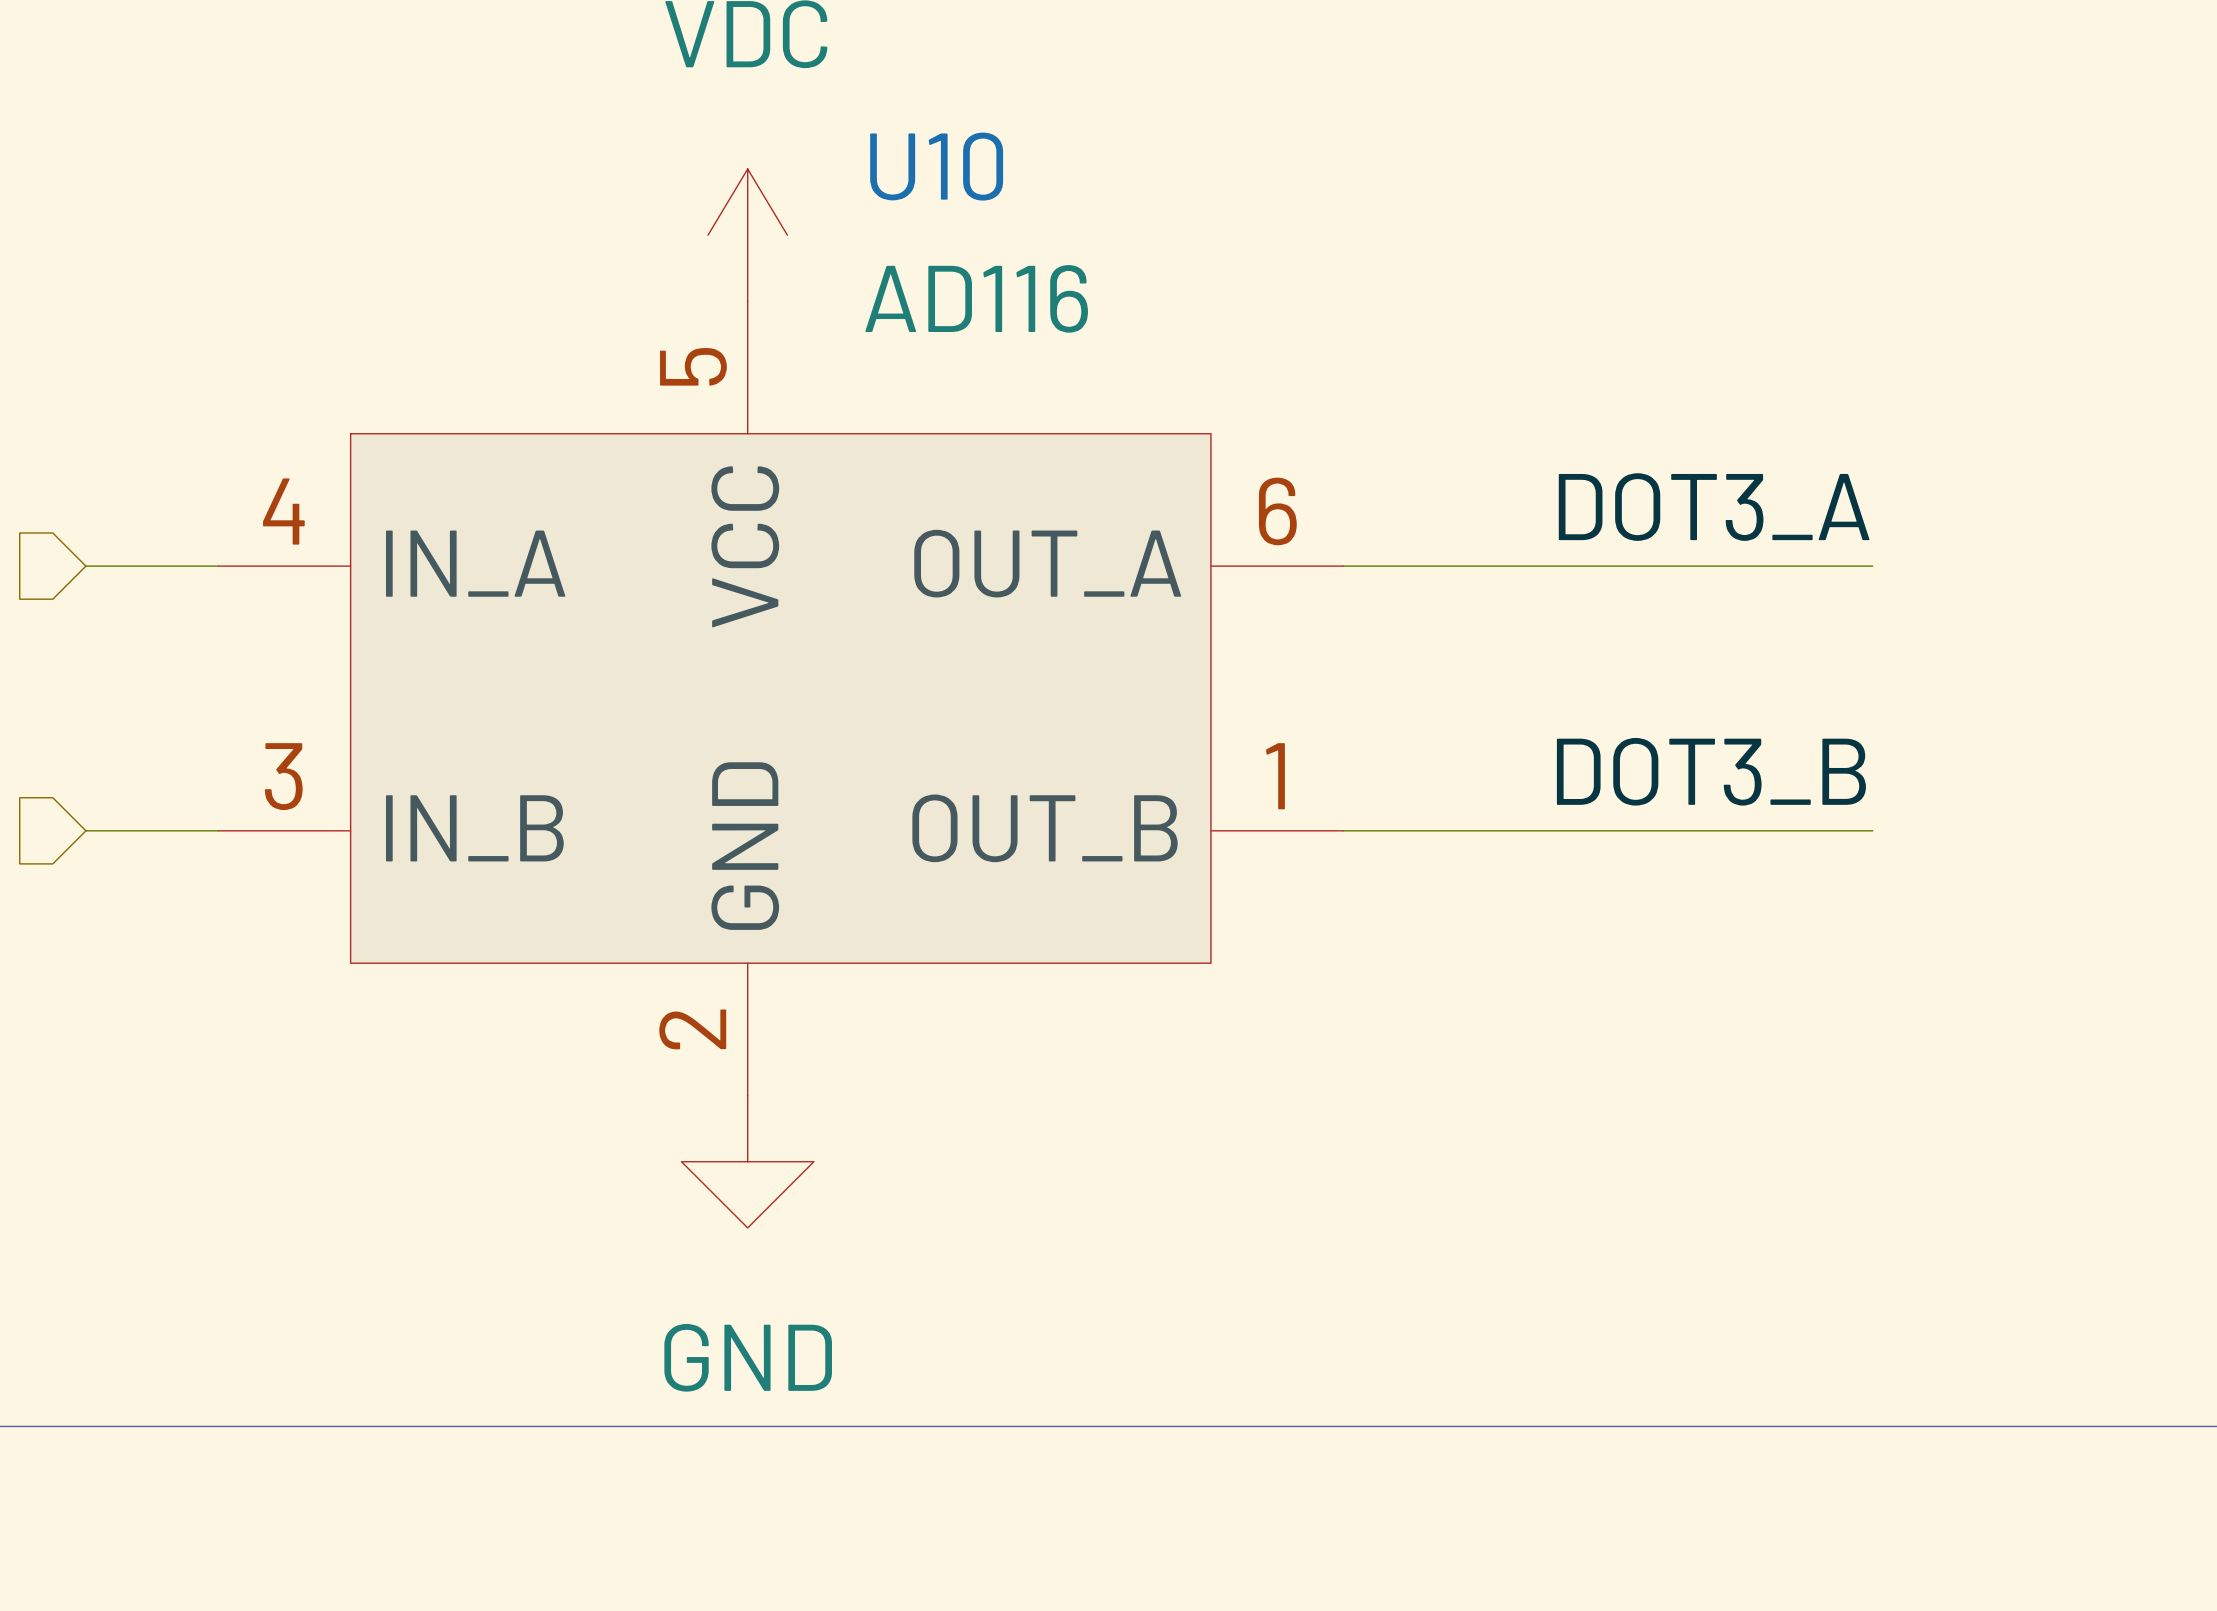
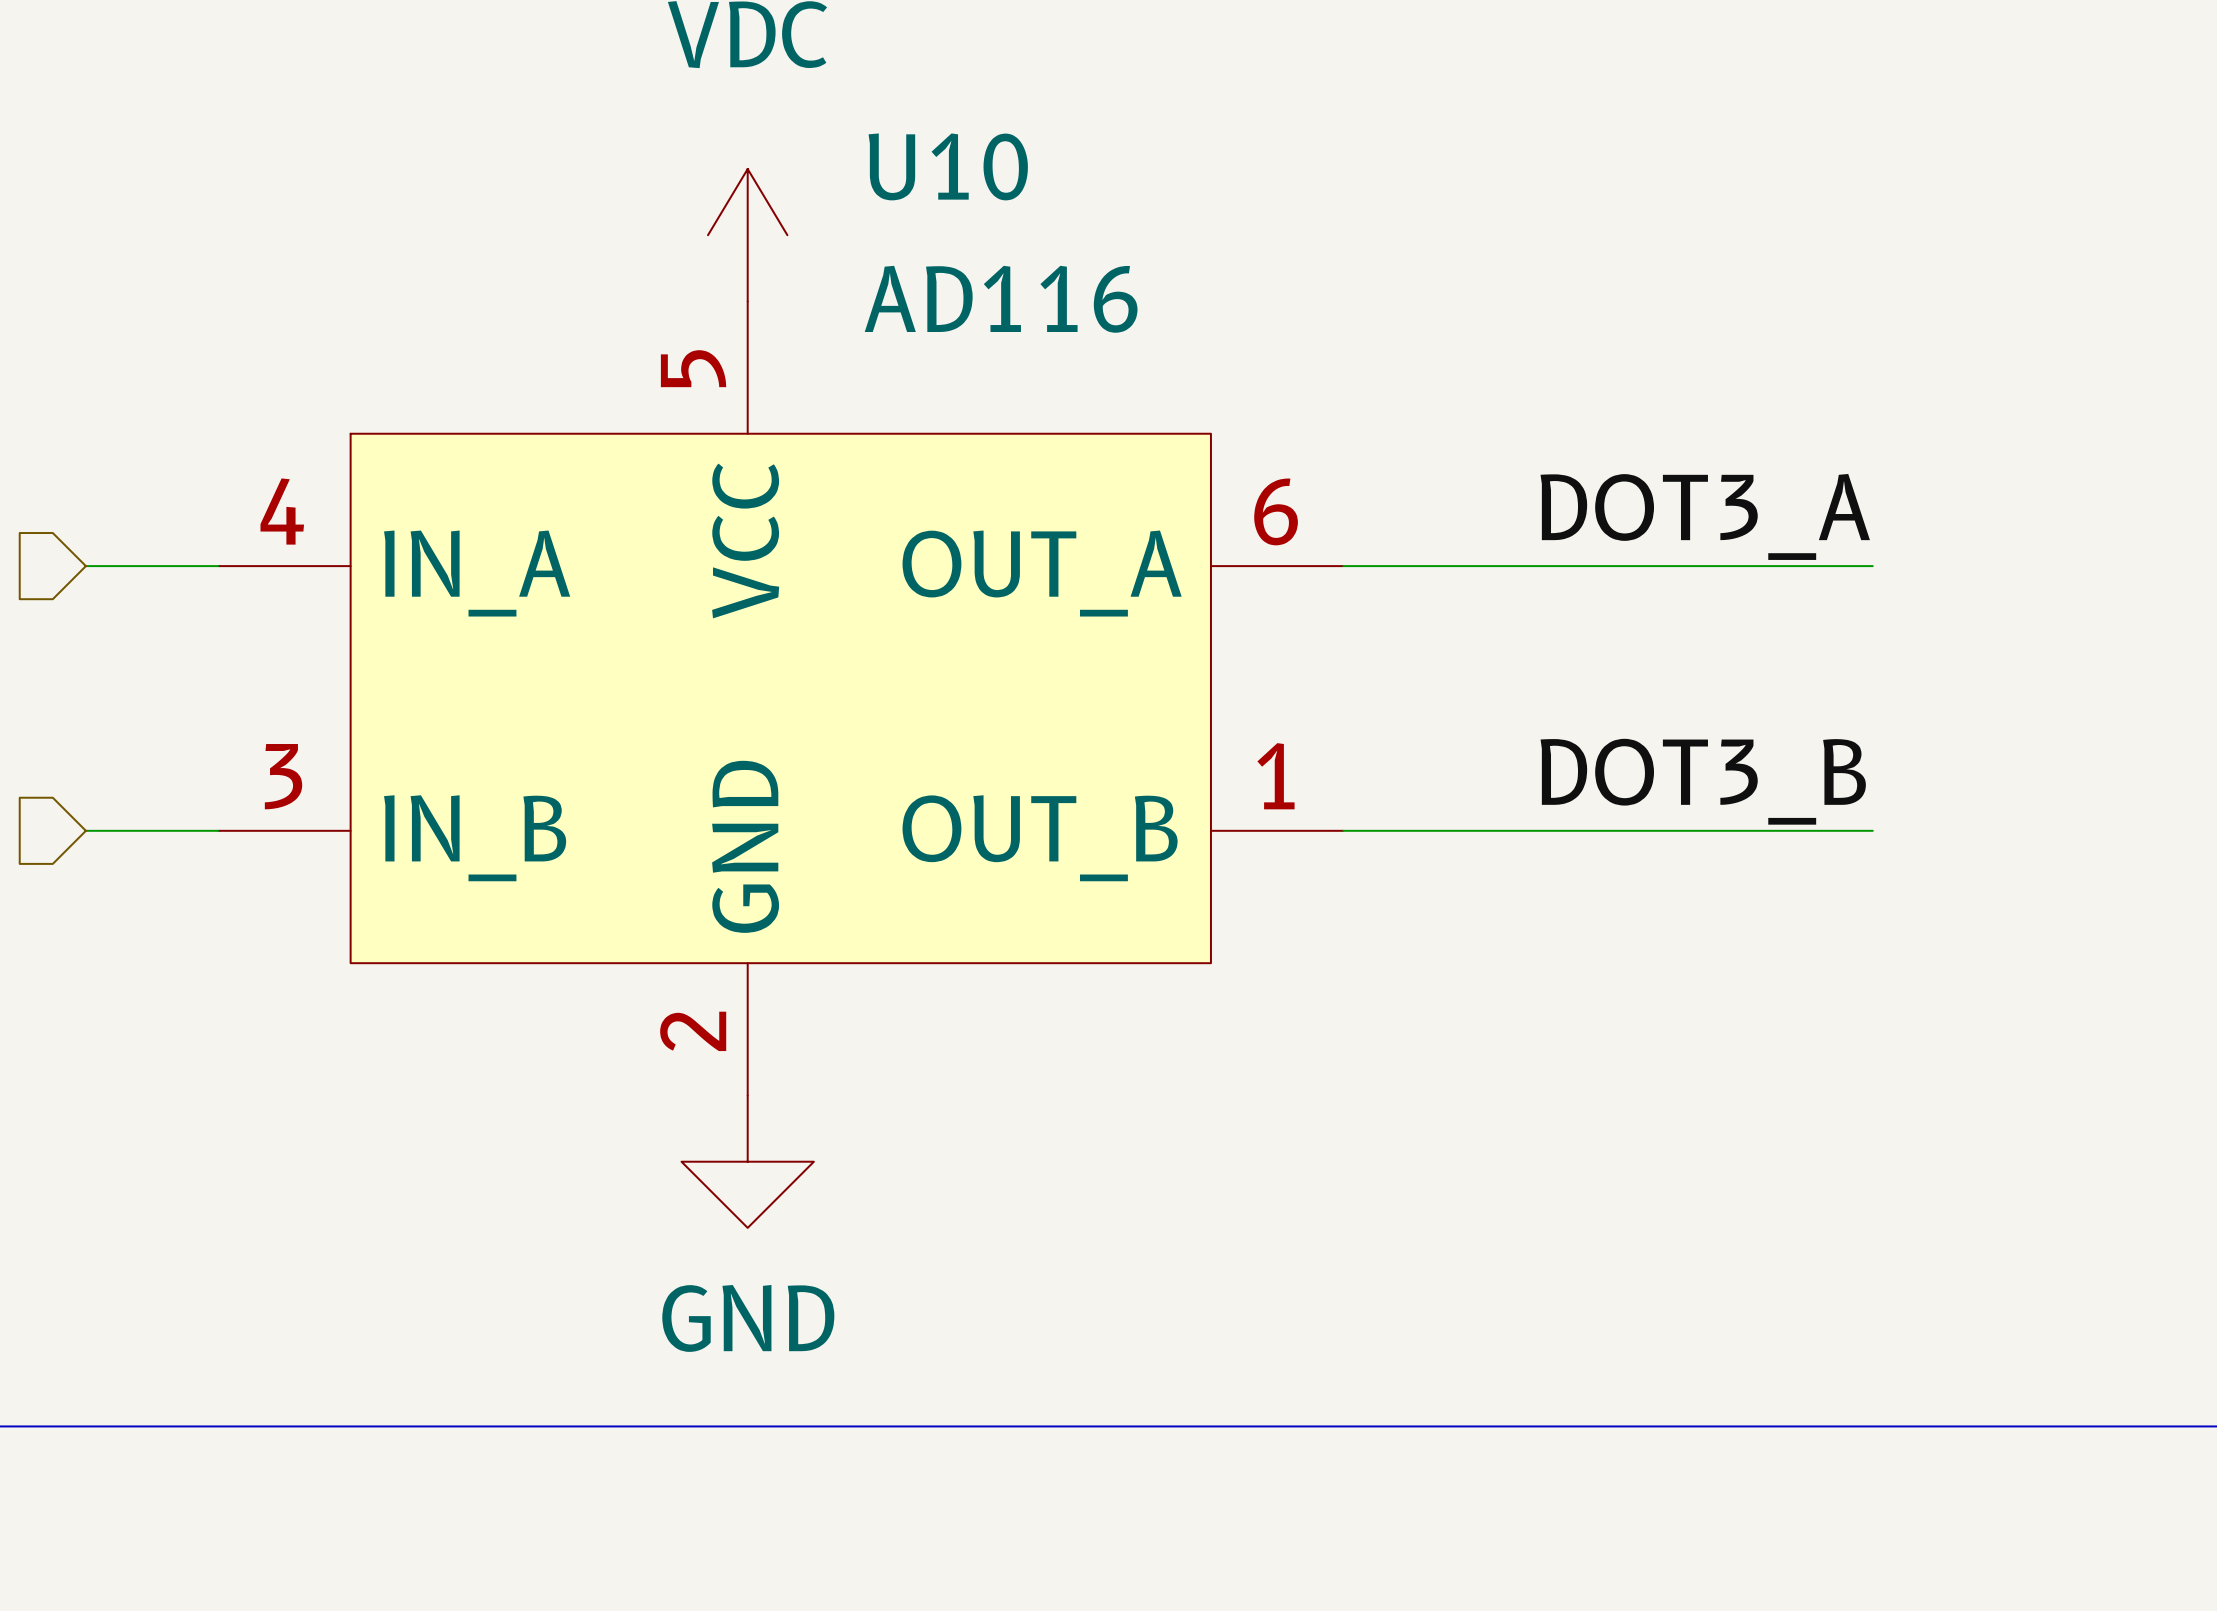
power symbol text position: GND (748, 1357) -> GND (748, 1318)

